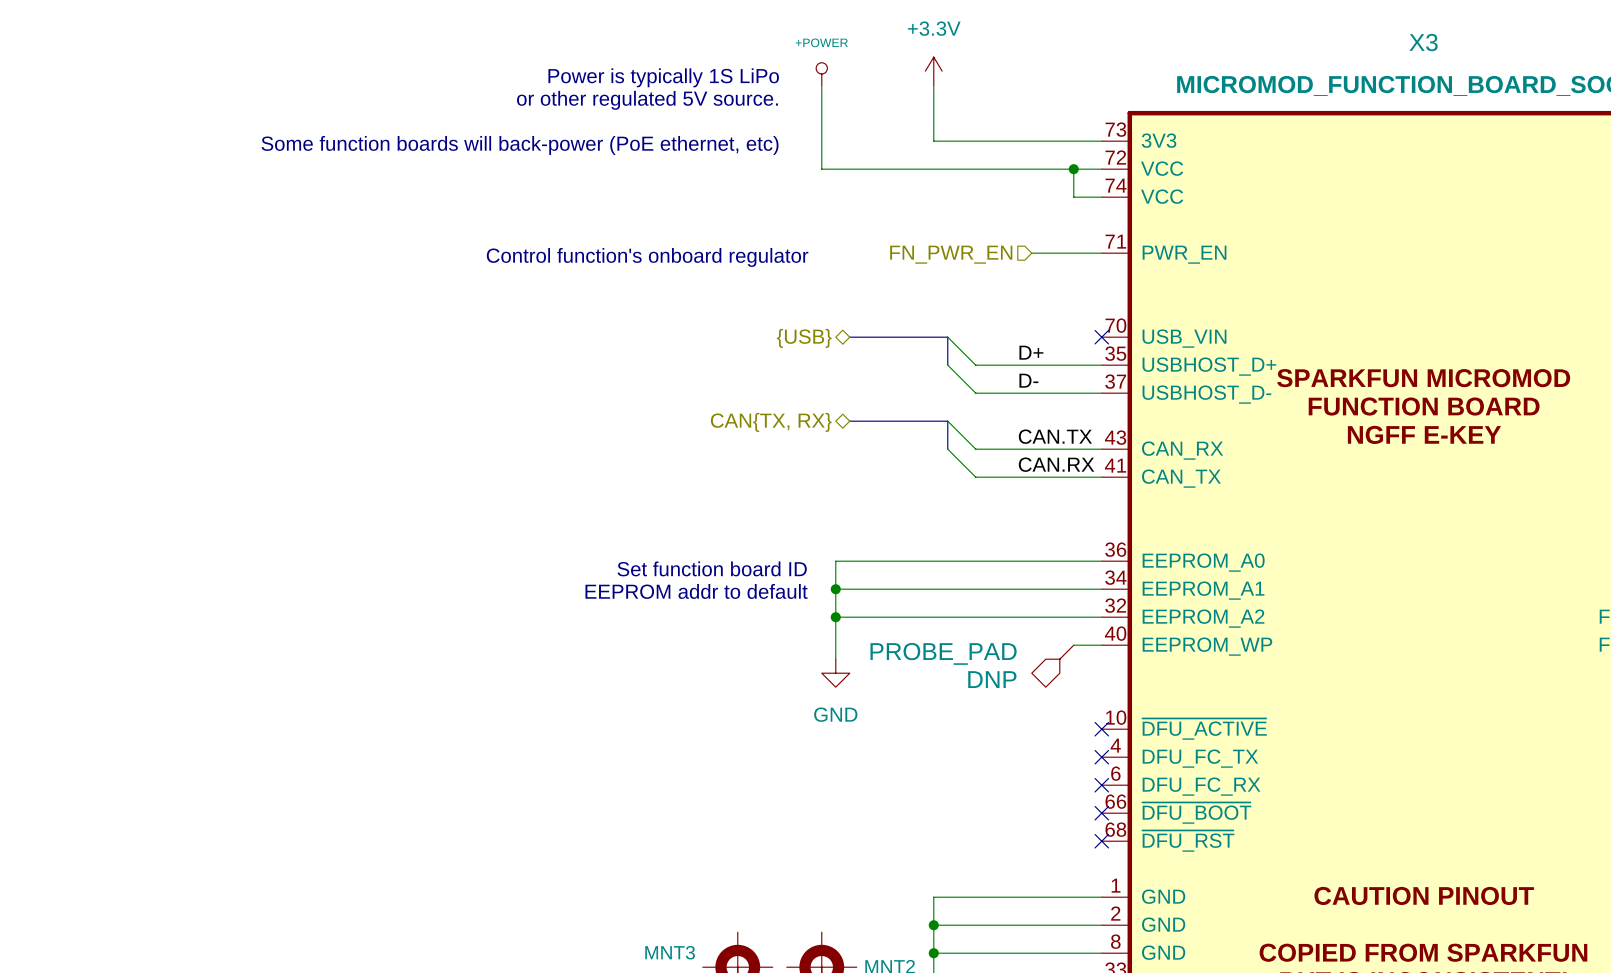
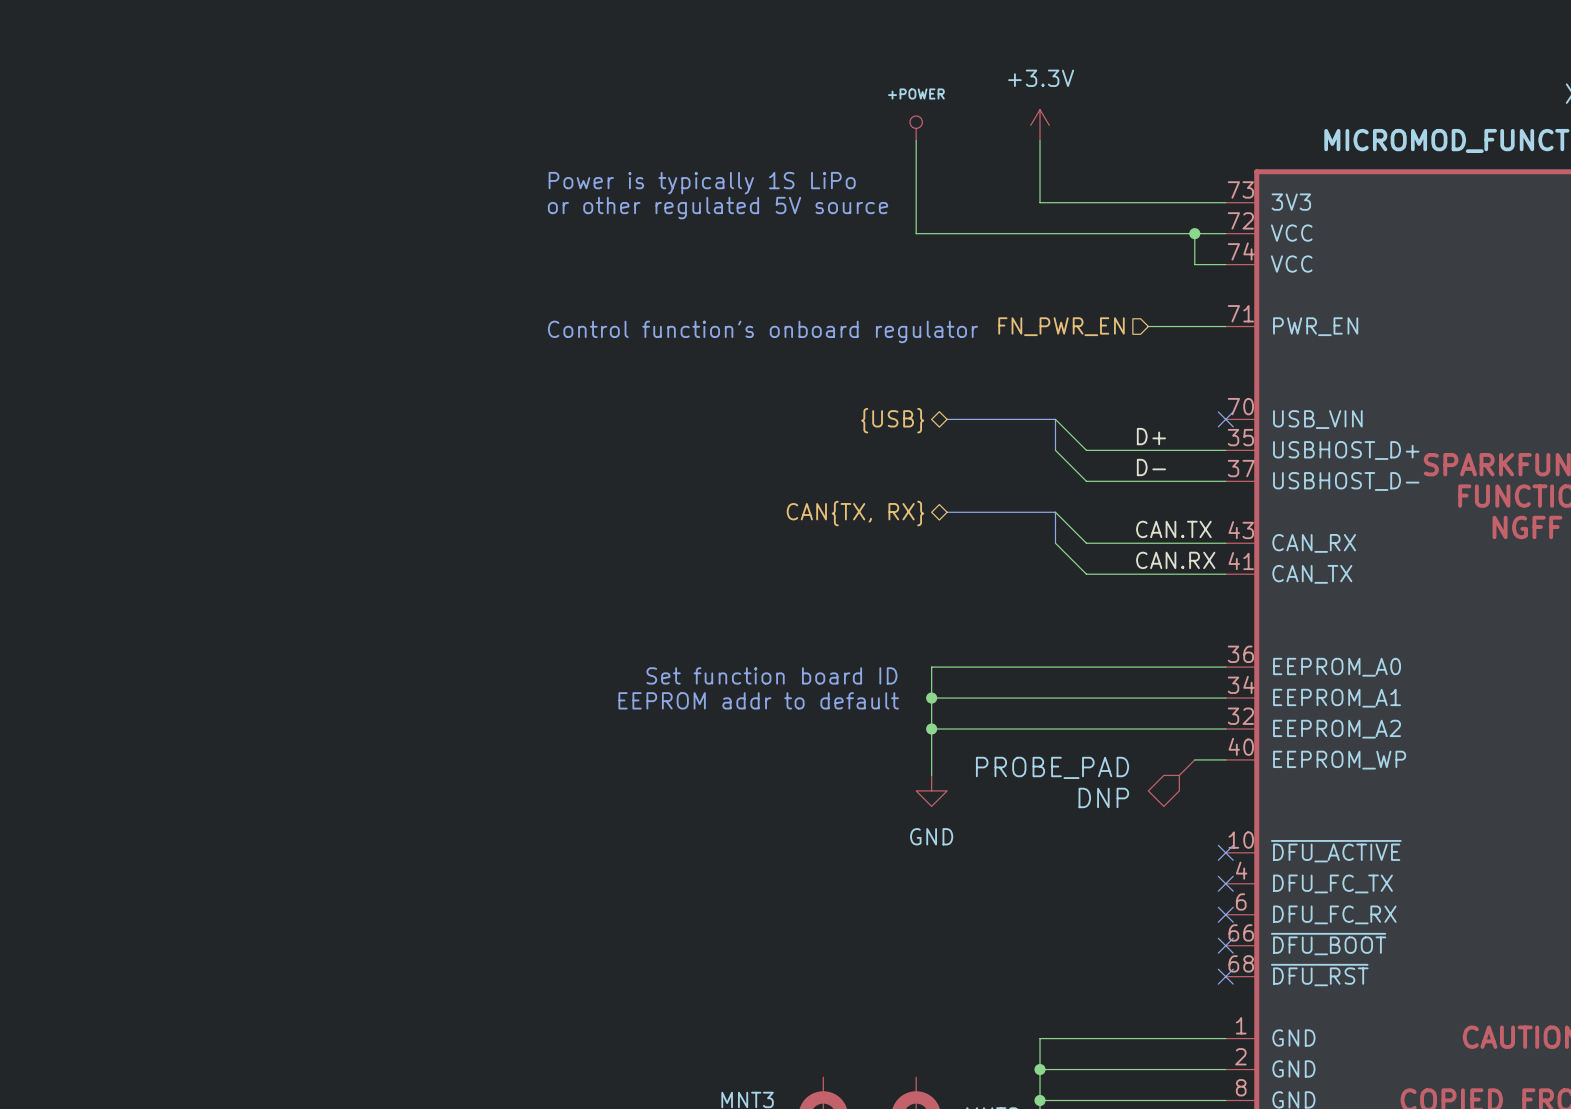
text: Power is typically 1S LiPo (663, 77) -> none
text: or other regulated 5V source. (647, 100) -> none
text: none -> Power is typically 1S LiPo (702, 183)
text: Some function boards will back-power (PoE ethernet, etc) (520, 145) -> none
text: none -> or other regulated 5V source (718, 208)

